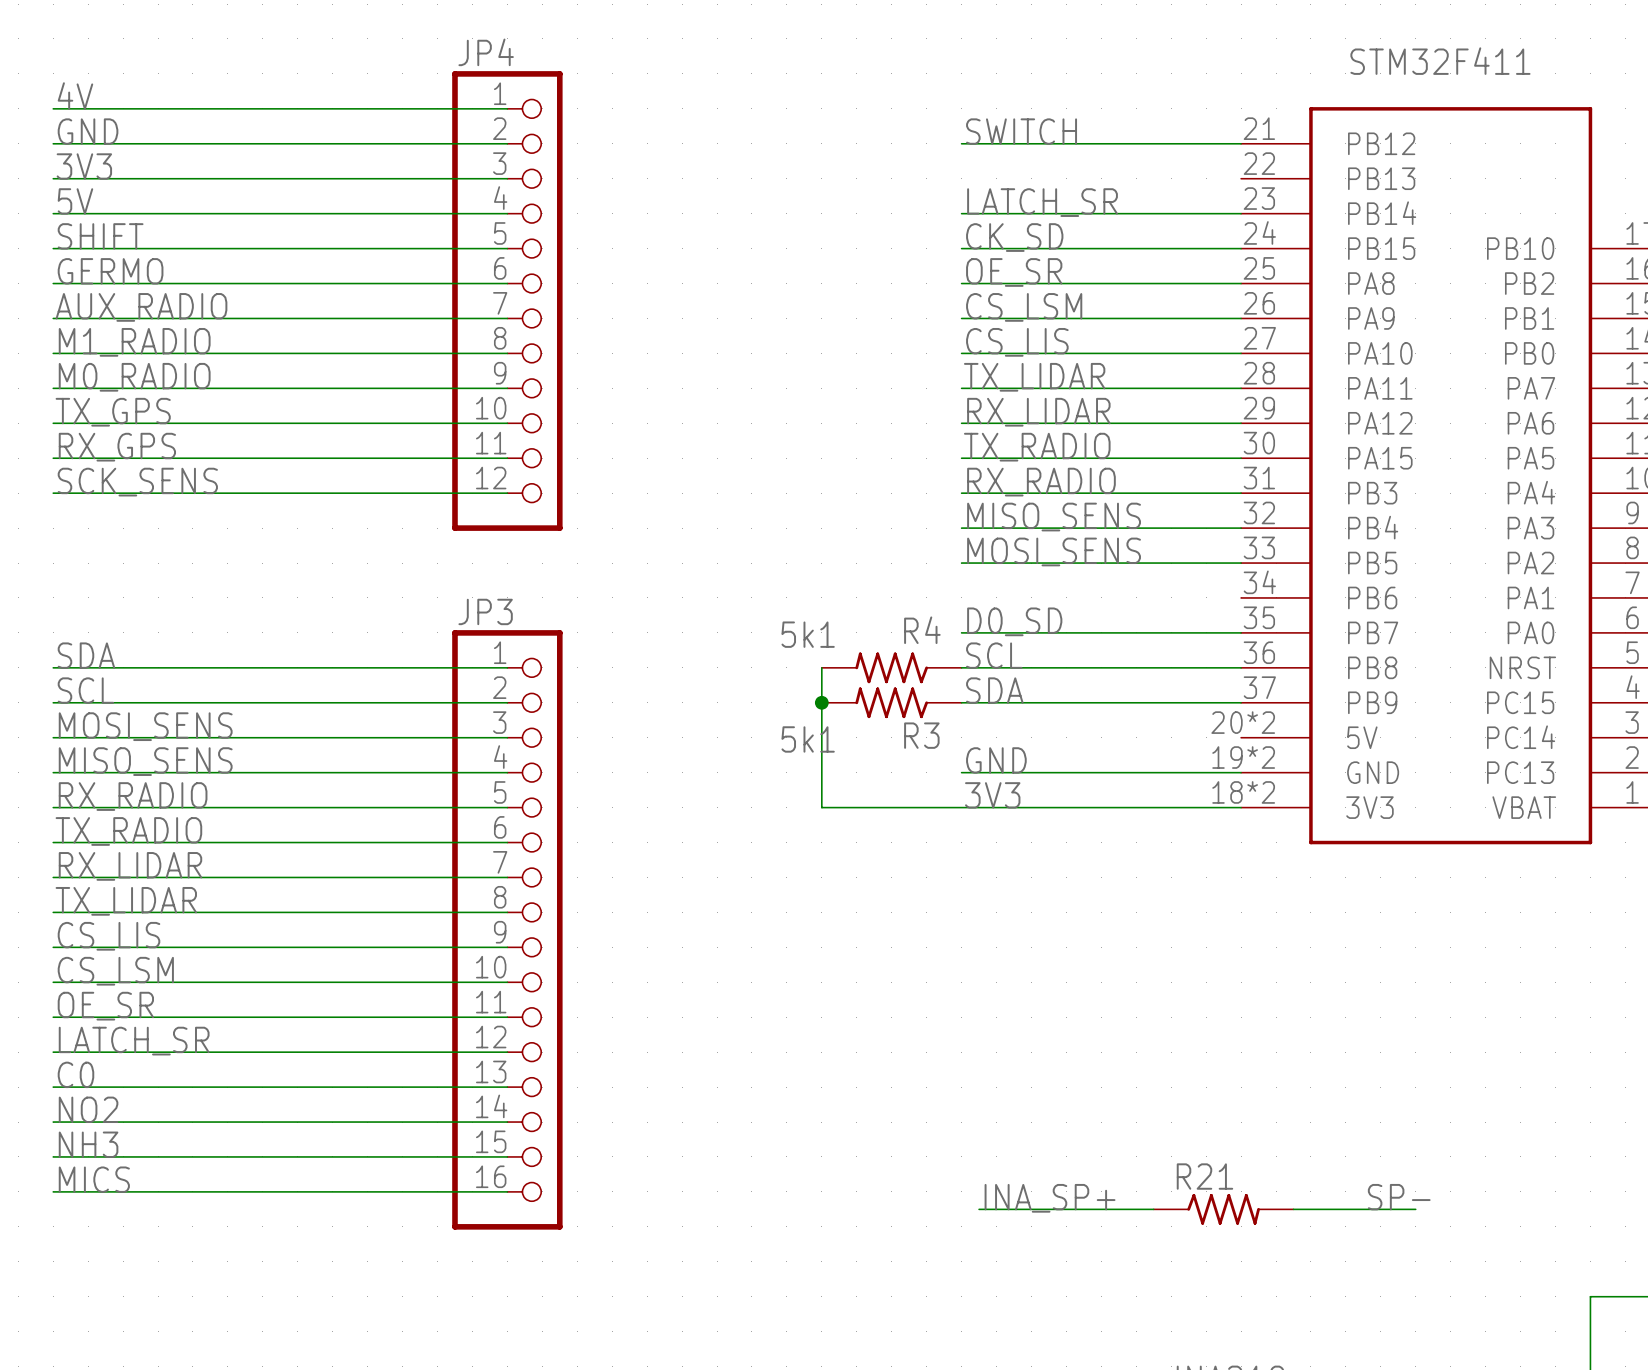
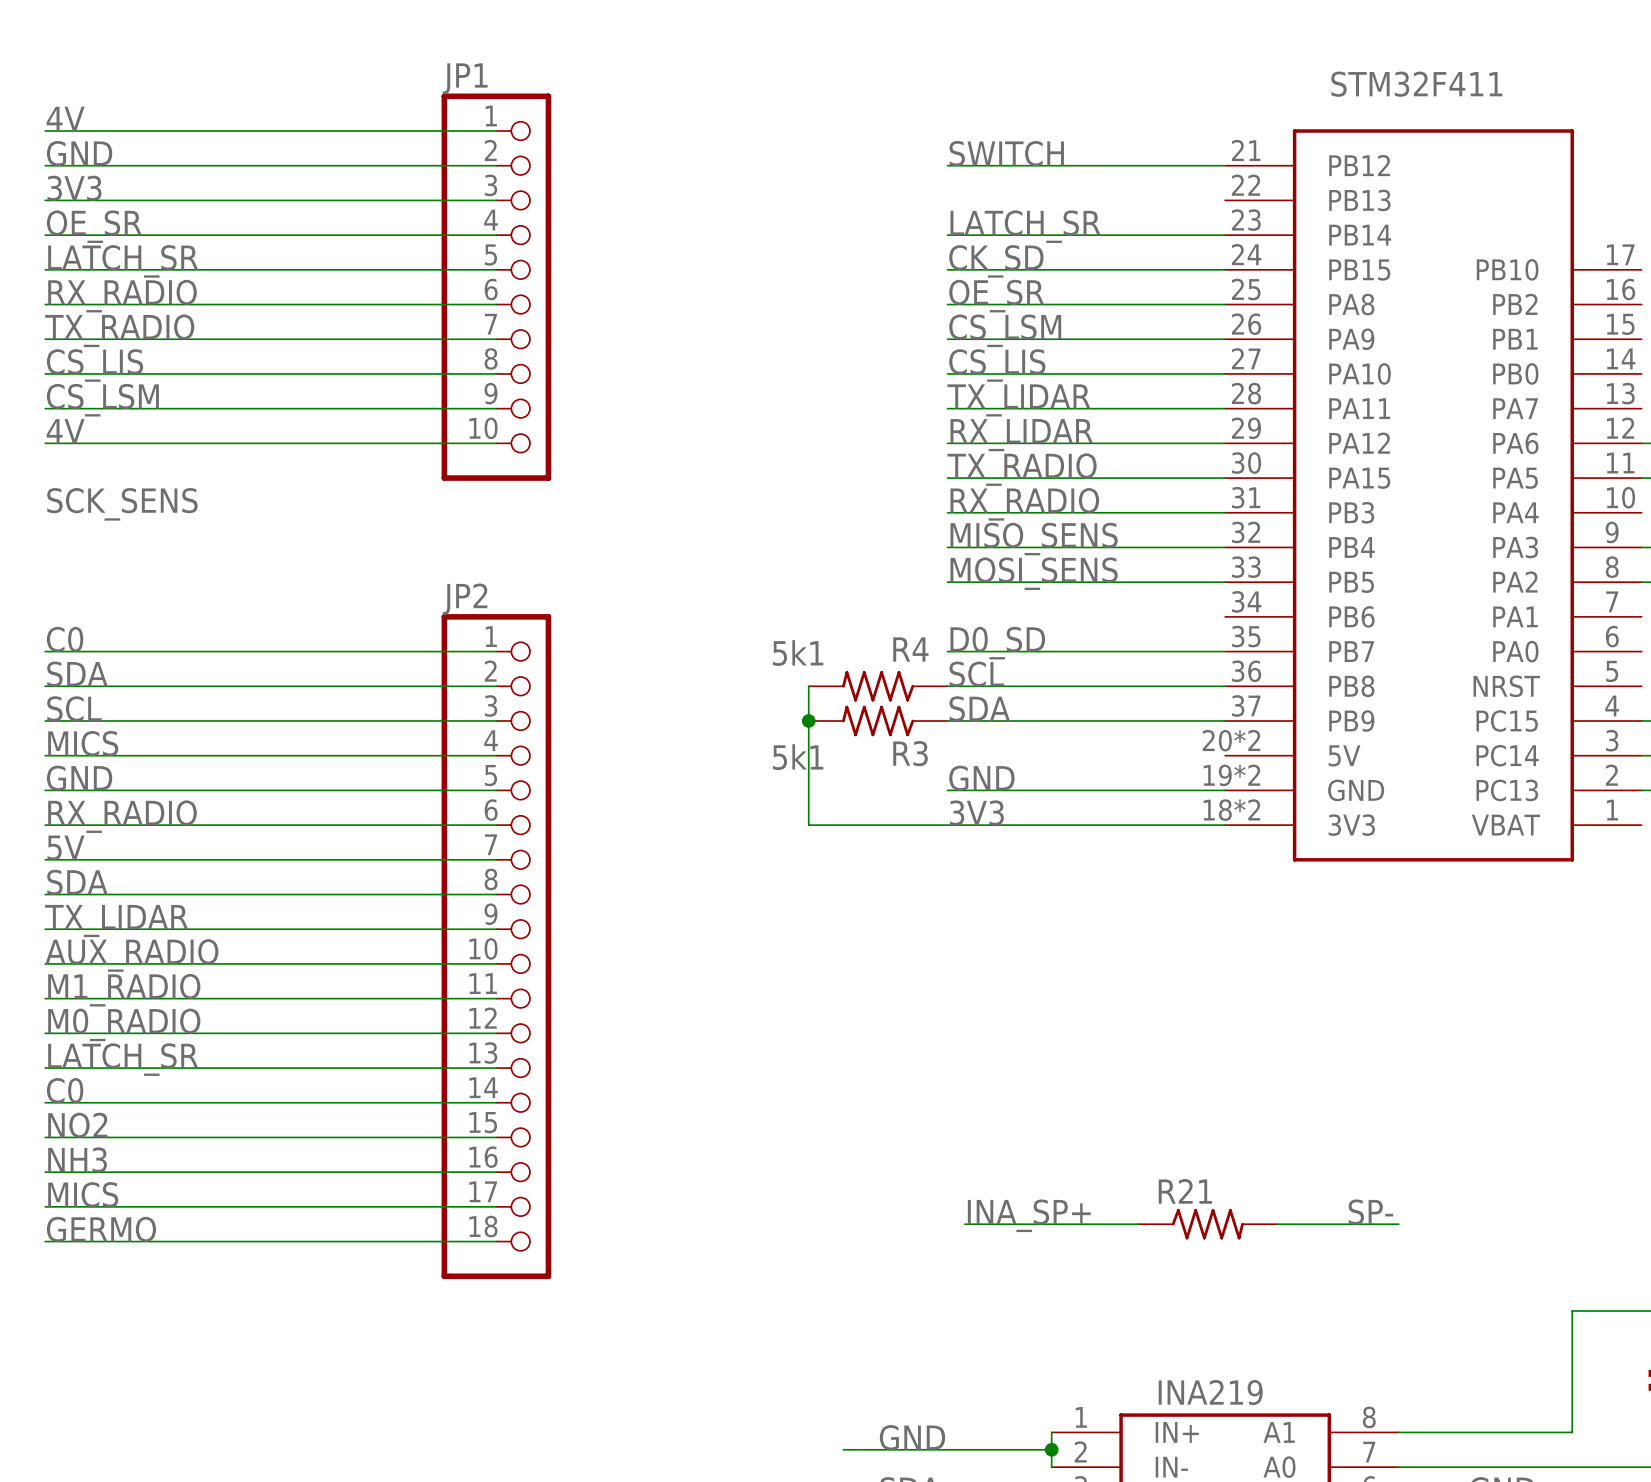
label: 5V (75, 201) -> OE_SR (94, 226)
label: SHIFT (100, 236) -> LATCH_SR (123, 261)
JP1: none -> (496, 287)
label: GERMO (110, 271) -> RX_RADIO (122, 296)
JP4: (507, 301) -> none
label: AUX_RADIO (141, 307) -> TX_RADIO (119, 330)
label: M1_RADIO (134, 342) -> CS_LIS (95, 365)
label: M0_RADIO (134, 377) -> CS_LSM (102, 400)
label: TX_GPS (113, 412) -> 4V (65, 431)
label: RX_GPS (117, 447) -> none
wire: (53, 458) (507, 458) -> none
wire: (53, 493) (507, 493) -> (45, 651) (496, 651)
label: none -> C0 (65, 639)
label: MOSI_SENS (145, 726) -> MICS (83, 743)
label: MISO_SENS (145, 761) -> GND (79, 778)
label: TX_RADIO (128, 831) -> 5V (66, 847)
label: RX_LIDAR (130, 866) -> SDA (77, 882)
JP3: (507, 929) -> none
JP2: none -> (496, 946)
label: CS_LIS (108, 936) -> AUX_RADIO (131, 955)
label: CS_LSM (115, 971) -> M1_RADIO (124, 990)
label: OE_SR (105, 1006) -> M0_RADIO (124, 1024)
label: none -> GERMO (101, 1229)
wire: none -> (45, 1241) (496, 1241)

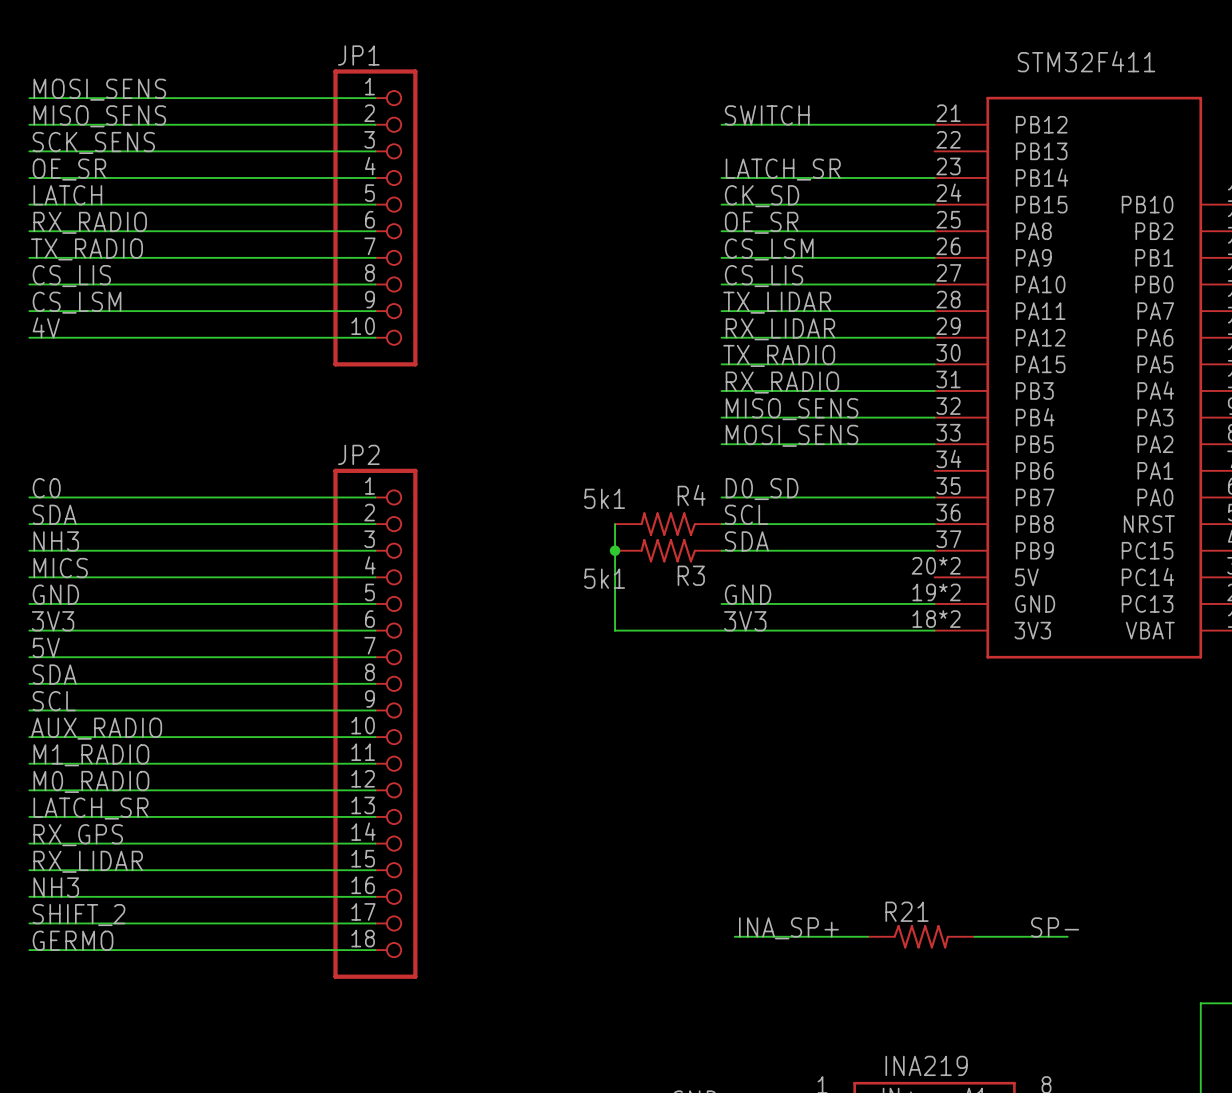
label: 4V (65, 118) -> MOSI_SENS (99, 89)
label: GND (79, 153) -> MISO_SENS (99, 116)
label: 3V3 (74, 188) -> SCK_SENS (93, 142)
label: LATCH_SR (123, 261) -> LATCH (67, 195)
label: SCK_SENS (122, 504) -> none
label: SCL (74, 708) -> NH3 (56, 541)
label: RX_RADIO (122, 816) -> 3V3 (53, 621)
label: TX_LIDAR (116, 921) -> SCL (54, 701)
label: C0 (65, 1090) -> RX_GPS (78, 835)
label: NO2 (77, 1125) -> RX_LIDAR (88, 861)
label: MICS (83, 1194) -> SHIFT_2 (79, 915)

